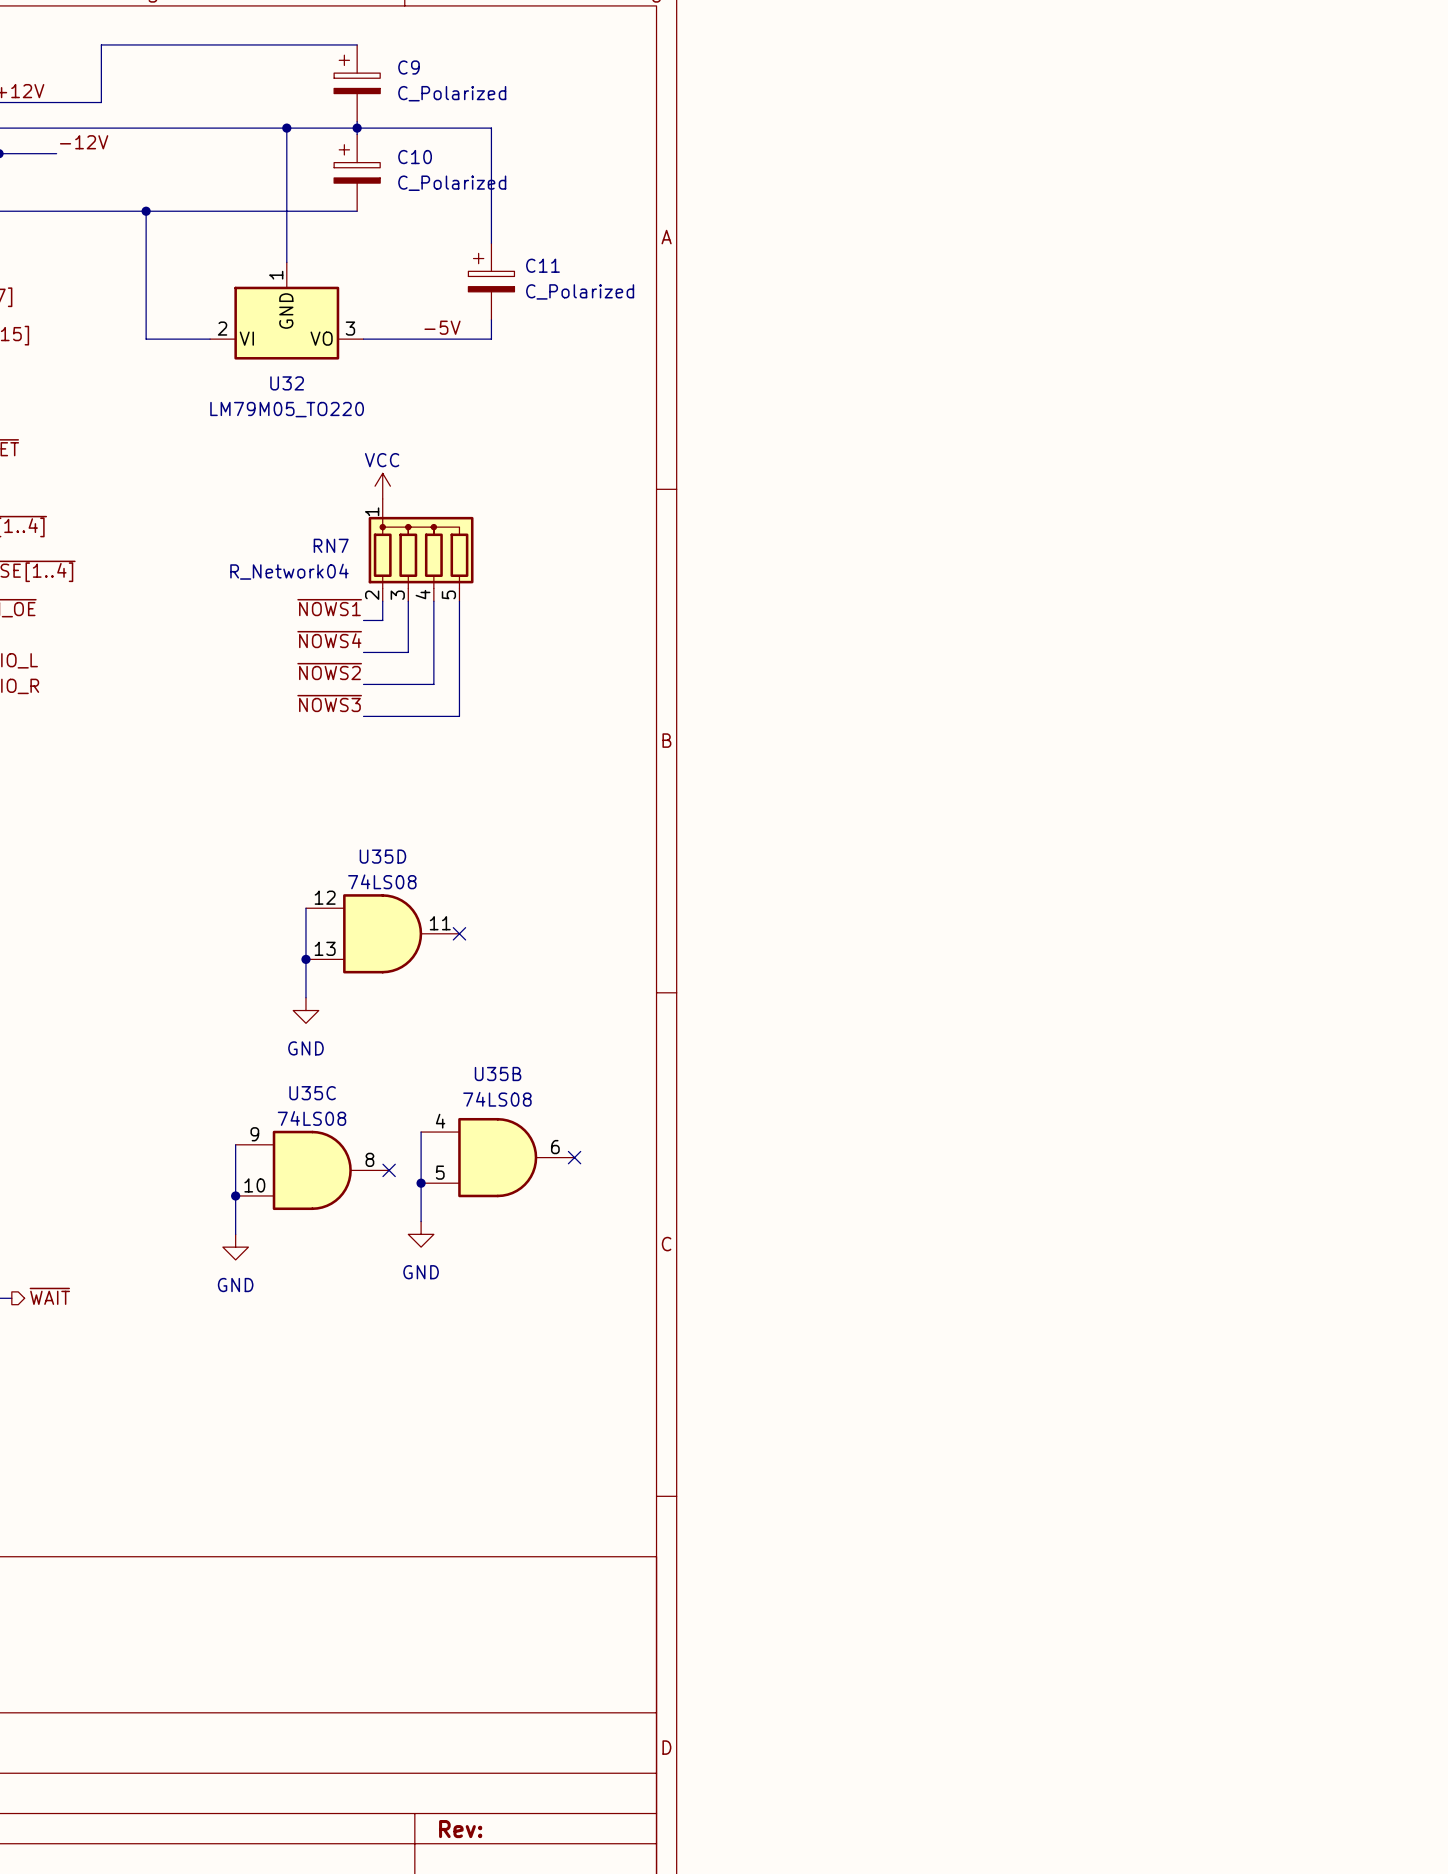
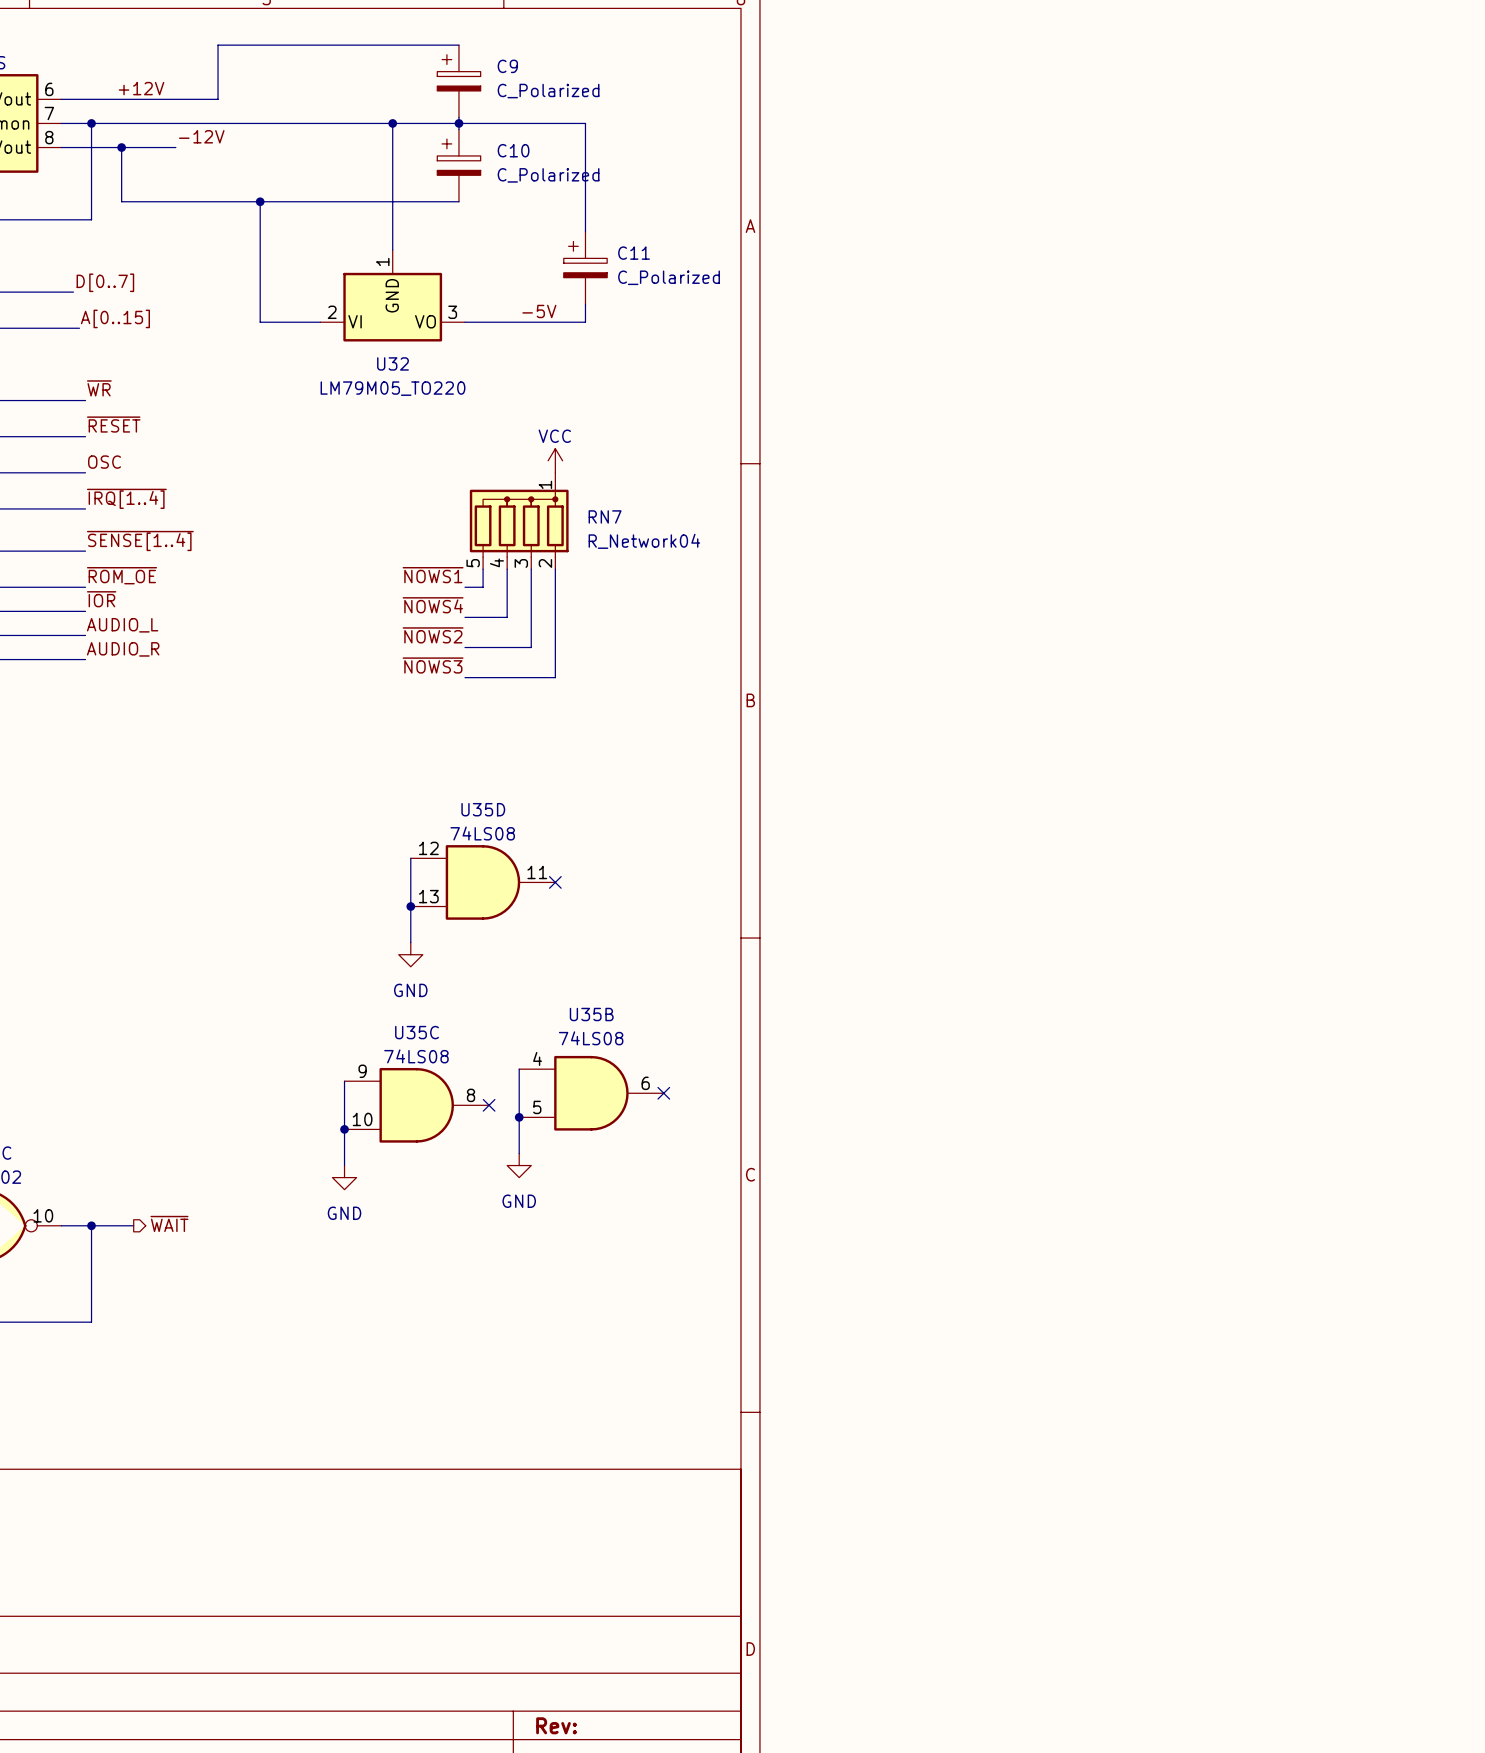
power symbol position: VCC (382, 486) -> VCC (555, 460)
RN7 flip: as is (421, 552) -> left-right (519, 523)

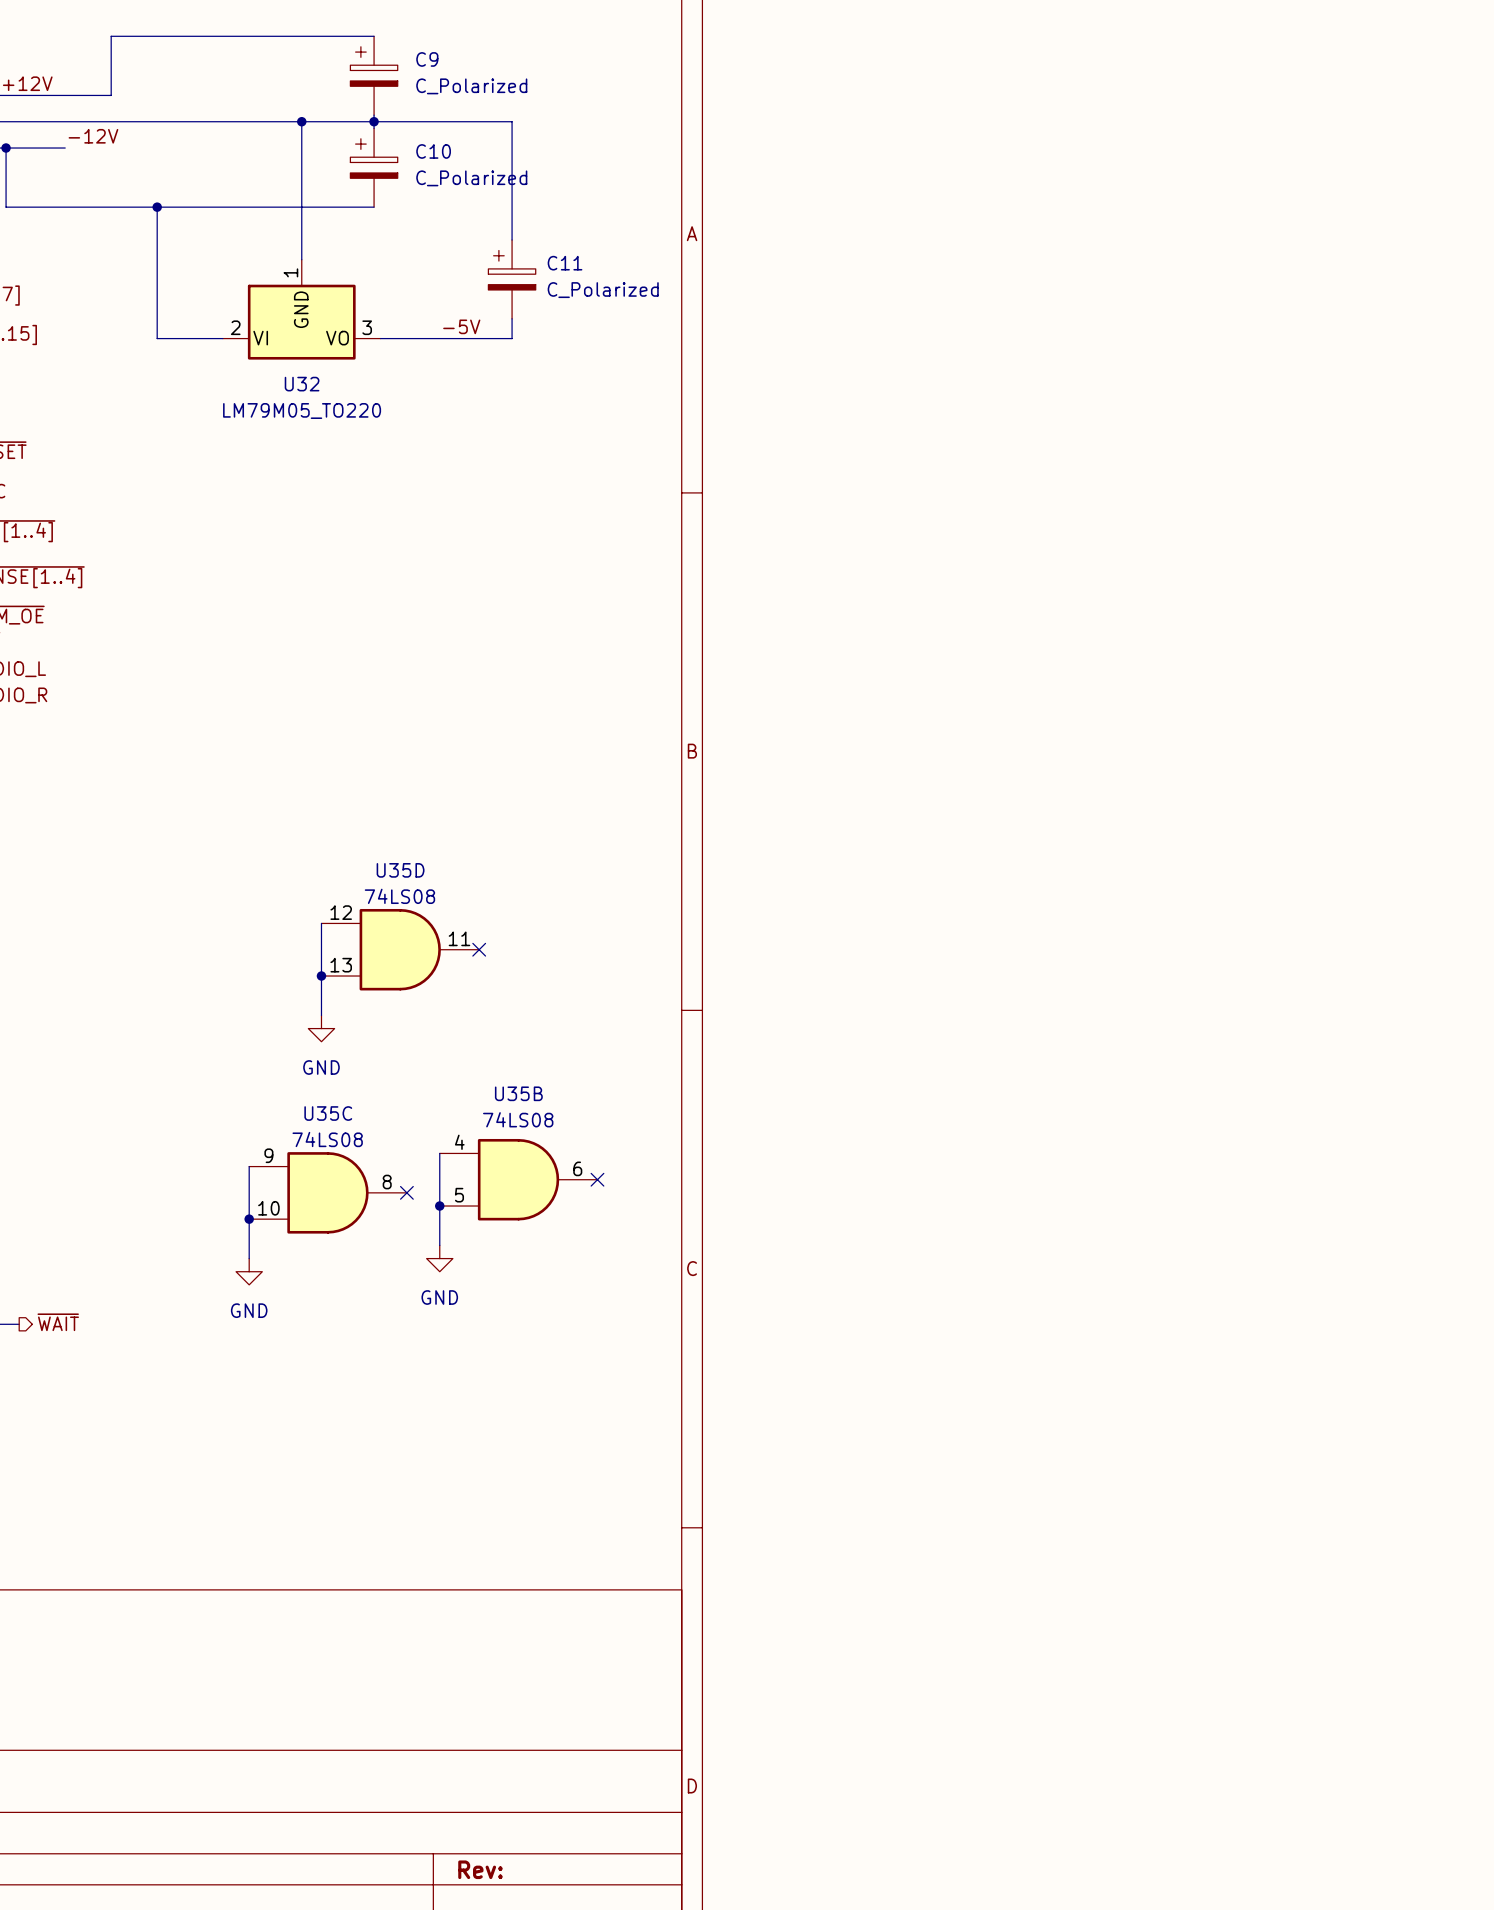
power symbol: VCC (555, 460) -> none
RN7: R_Network04 (519, 521) -> none
wire: (483, 569) (483, 587) (465, 587) -> none
wire: (507, 569) (507, 617) (465, 617) -> none
wire: (531, 569) (531, 647) (465, 647) -> none
wire: (555, 569) (555, 677) (465, 677) -> none
label: ~{NOWS1} (433, 575) -> none
label: ~{NOWS4} (433, 605) -> none
label: ~{NOWS2} (433, 635) -> none
label: ~{NOWS3} (433, 665) -> none

